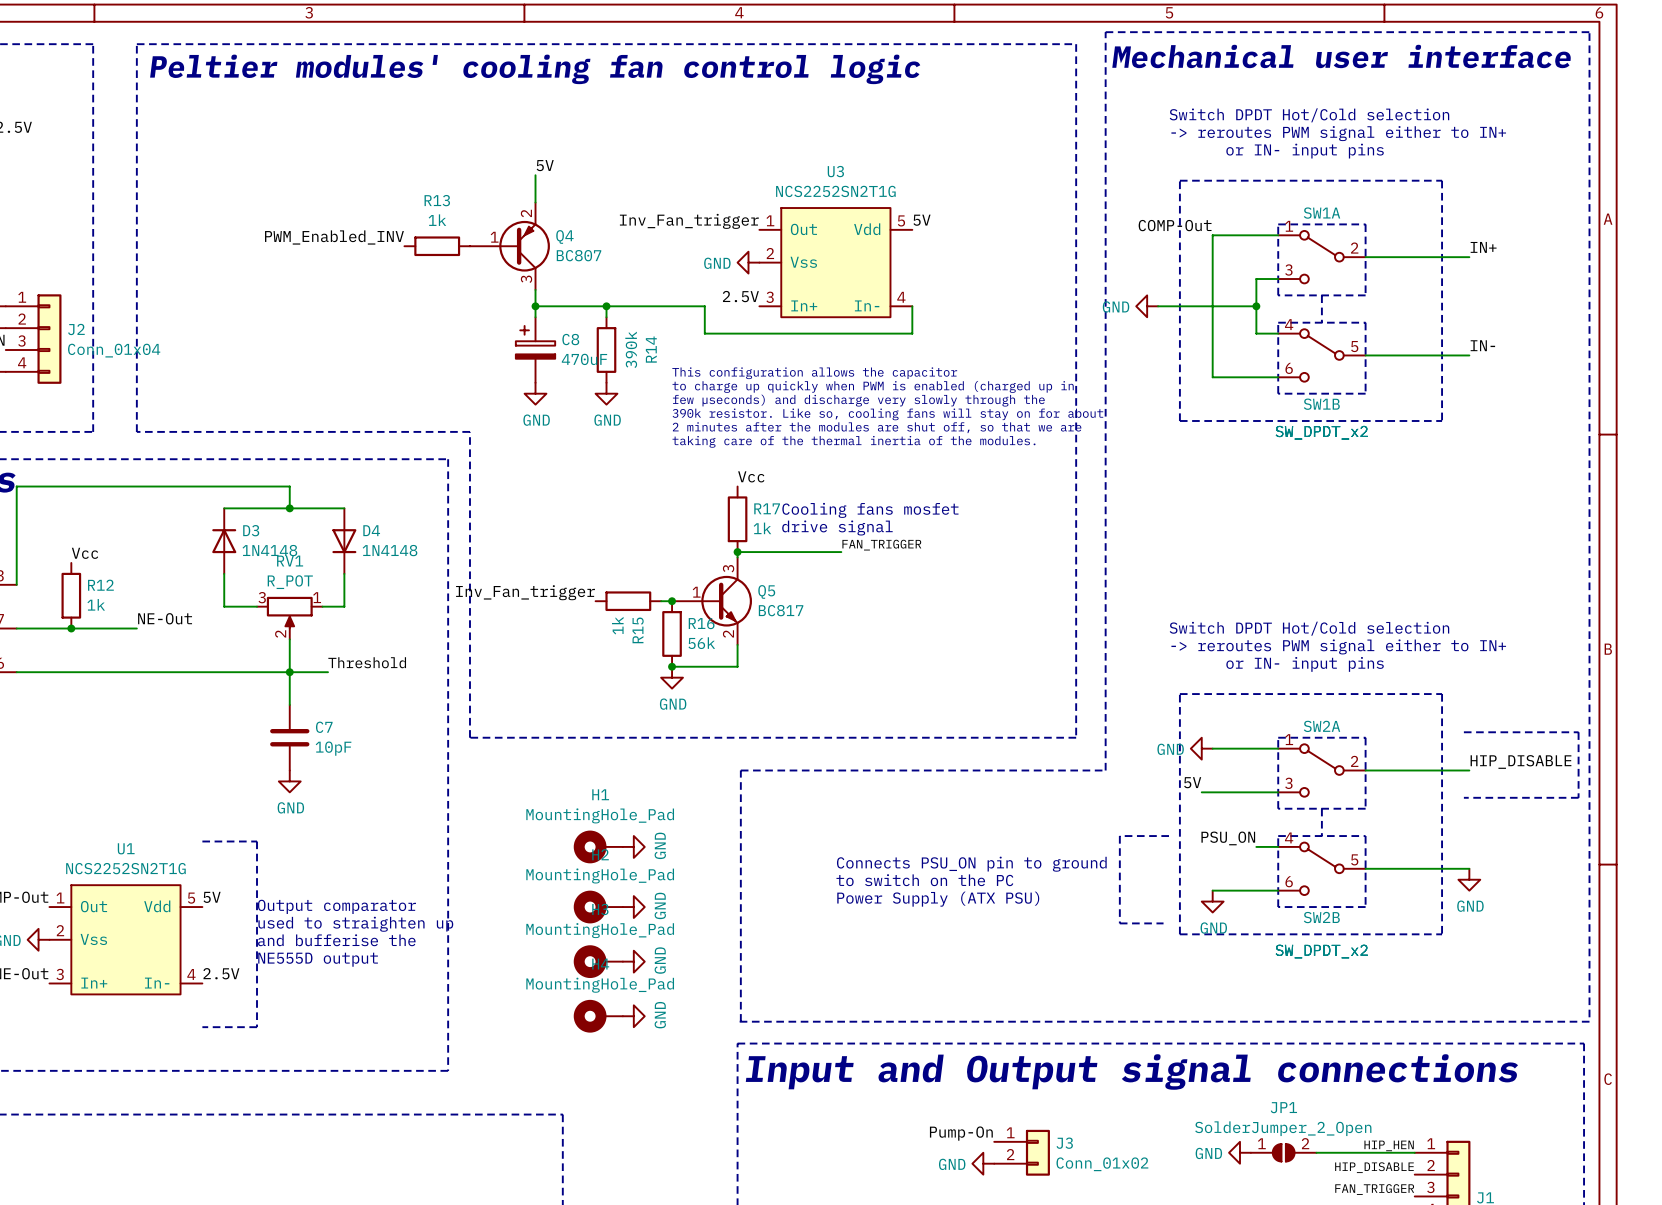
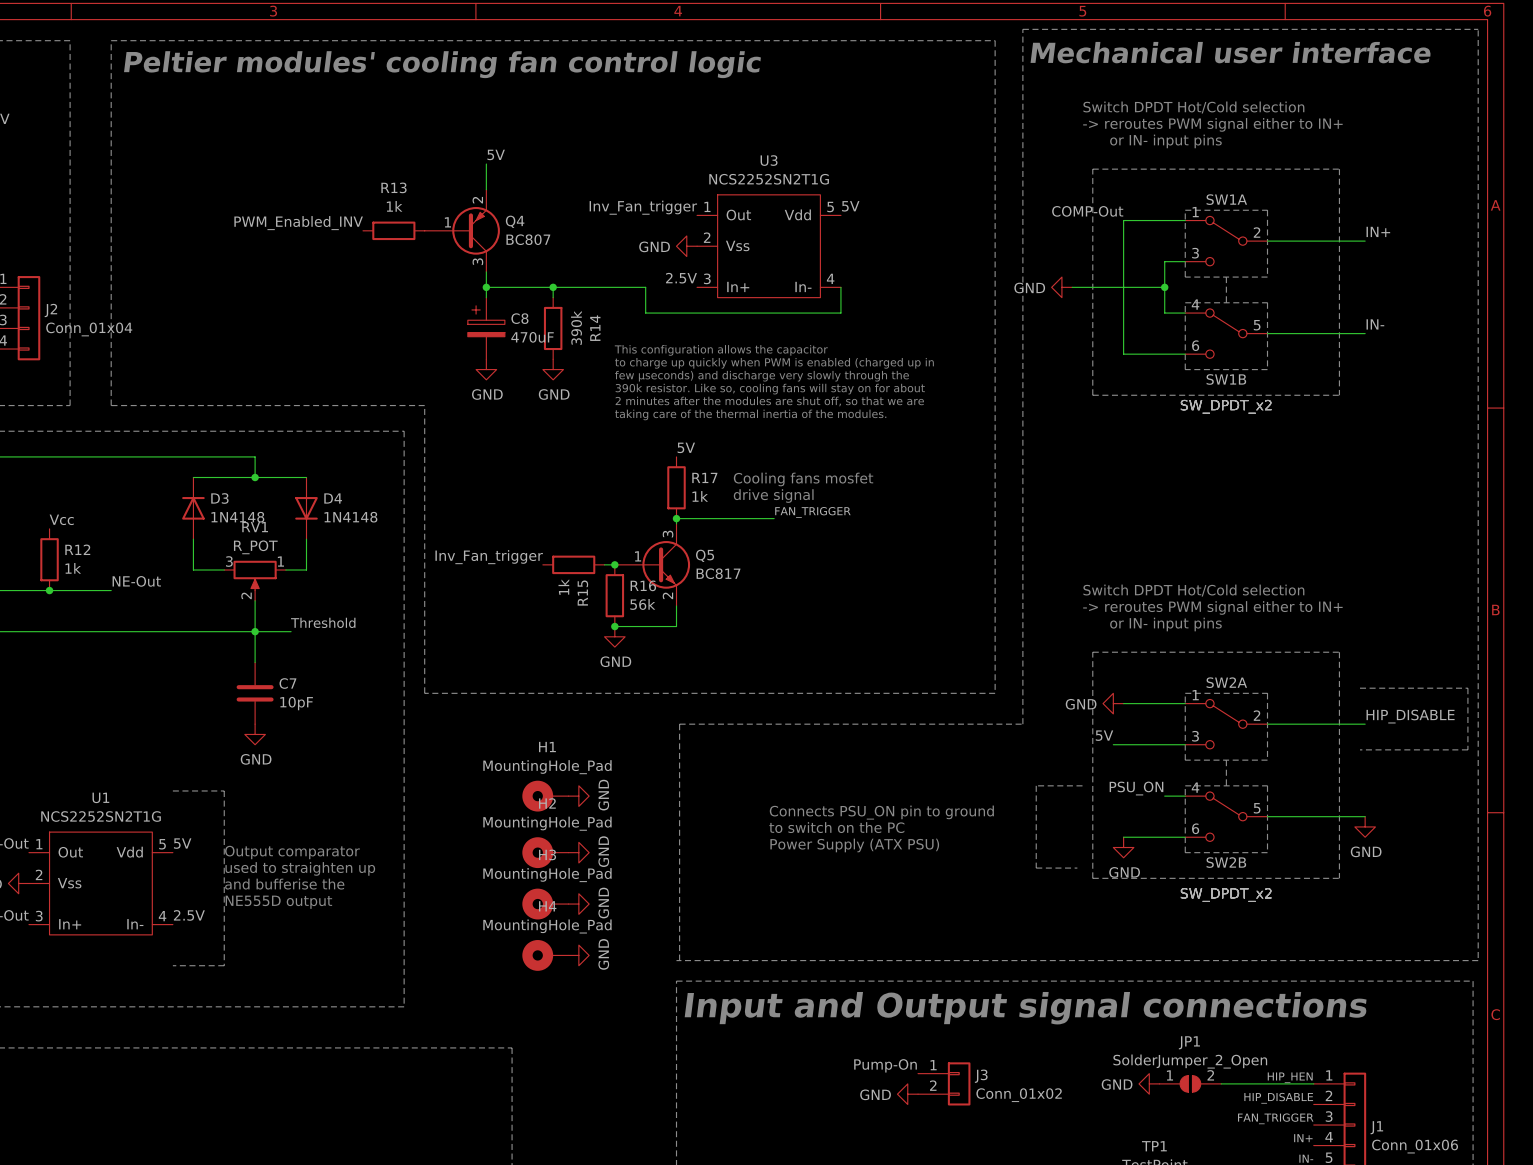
label: Vcc (751, 476) -> 5V (686, 447)
text position: Cooling fans mosfet (870, 510) -> Cooling fans mosfet (803, 479)
text position: drive signal (837, 527) -> drive signal (773, 496)

